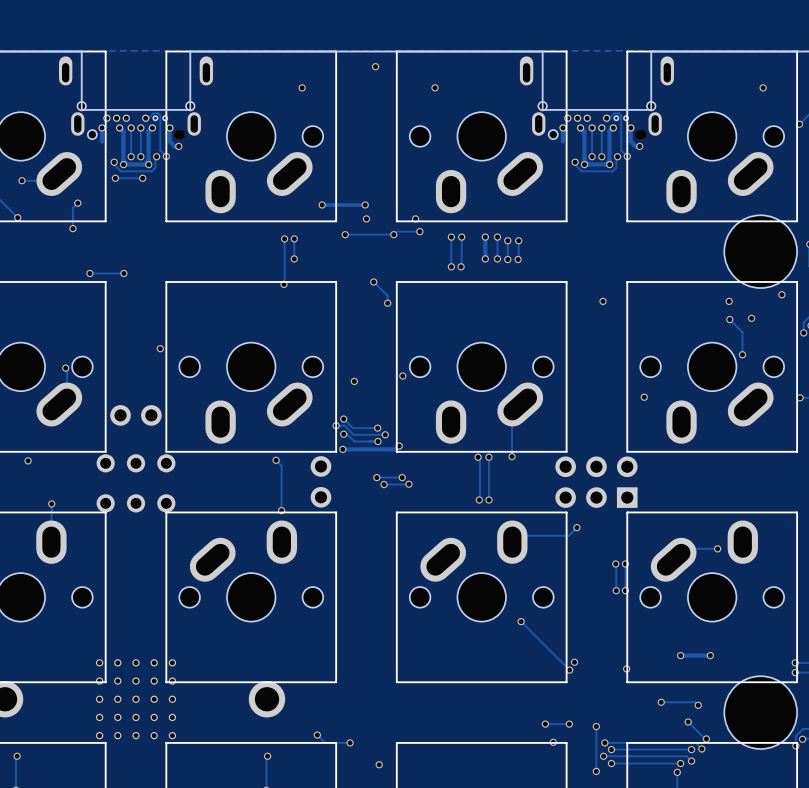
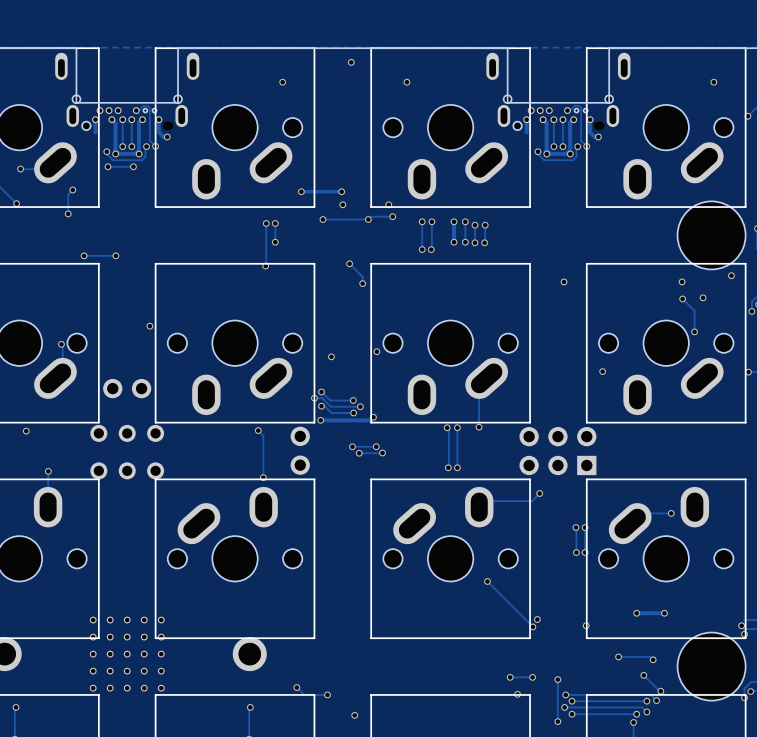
via: (795, 662) -> none
via: none -> (741, 625)
via: (795, 672) -> none
via: none -> (744, 634)

